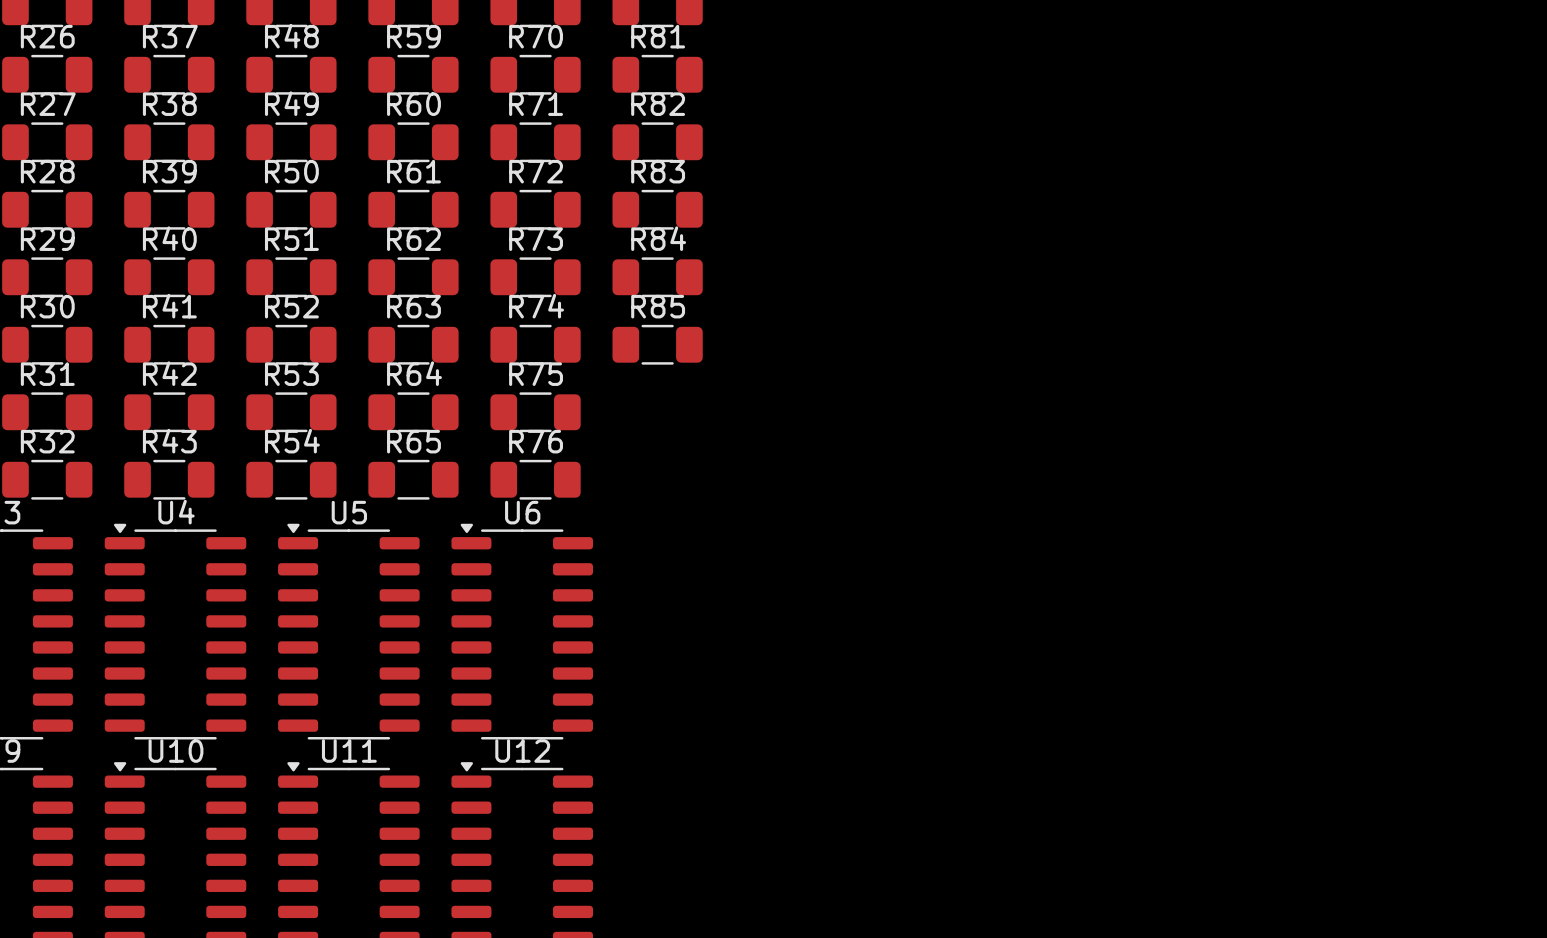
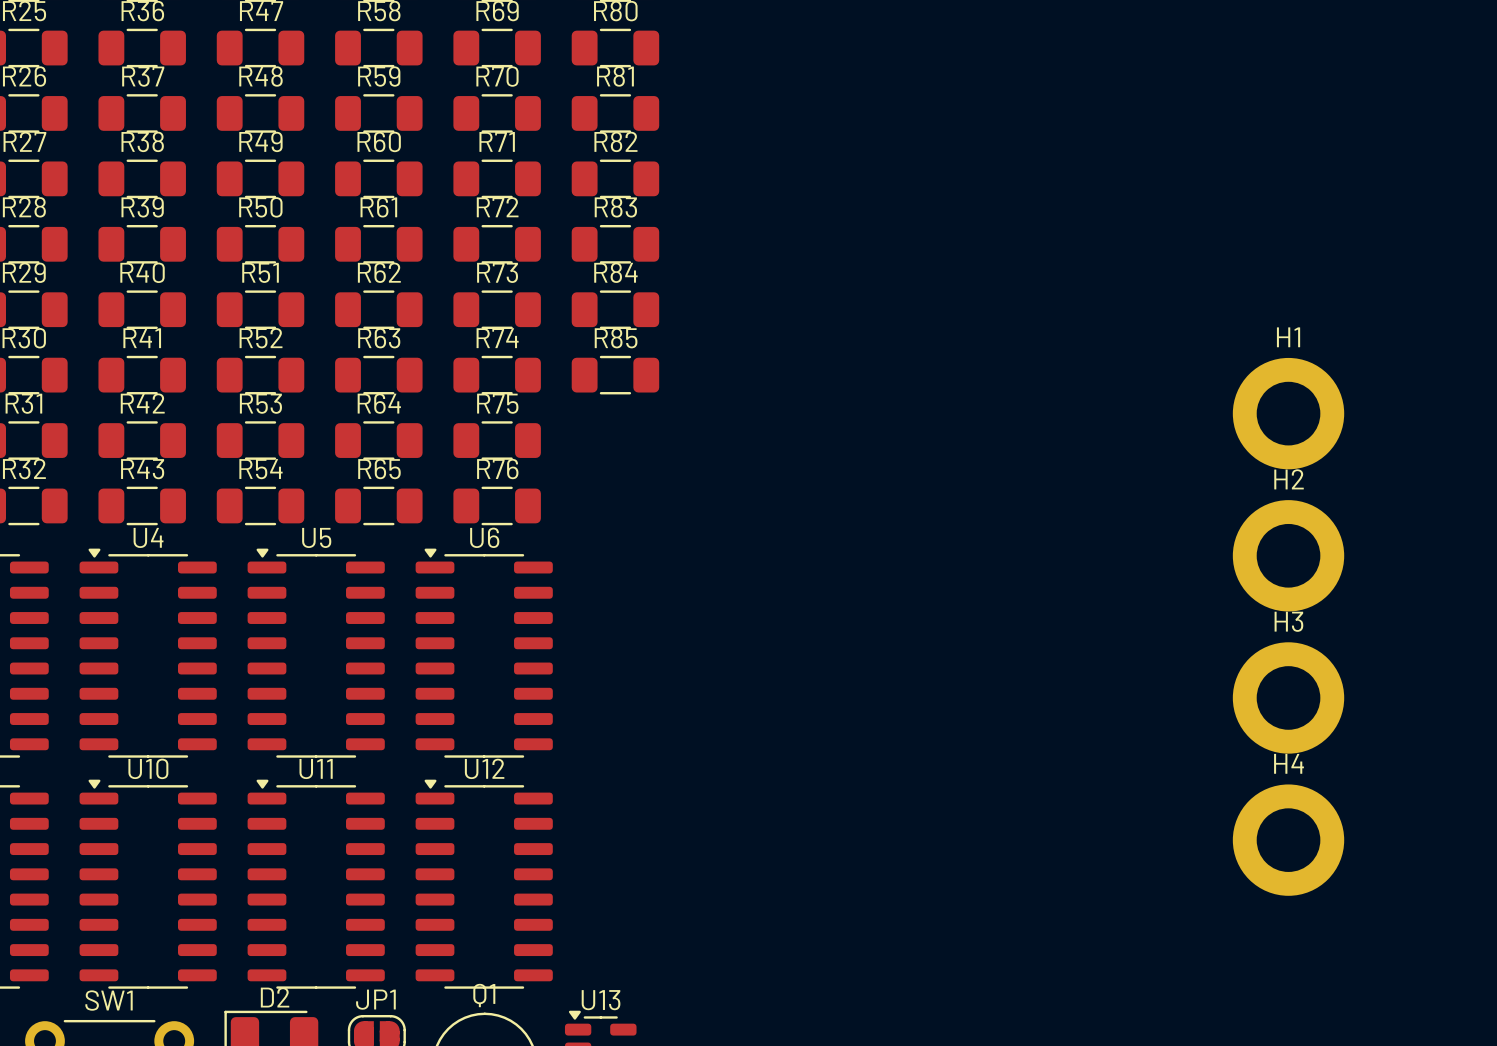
H1: none -> (1288, 413)
H2: none -> (1288, 555)
H3: none -> (1288, 697)
H4: none -> (1288, 840)

